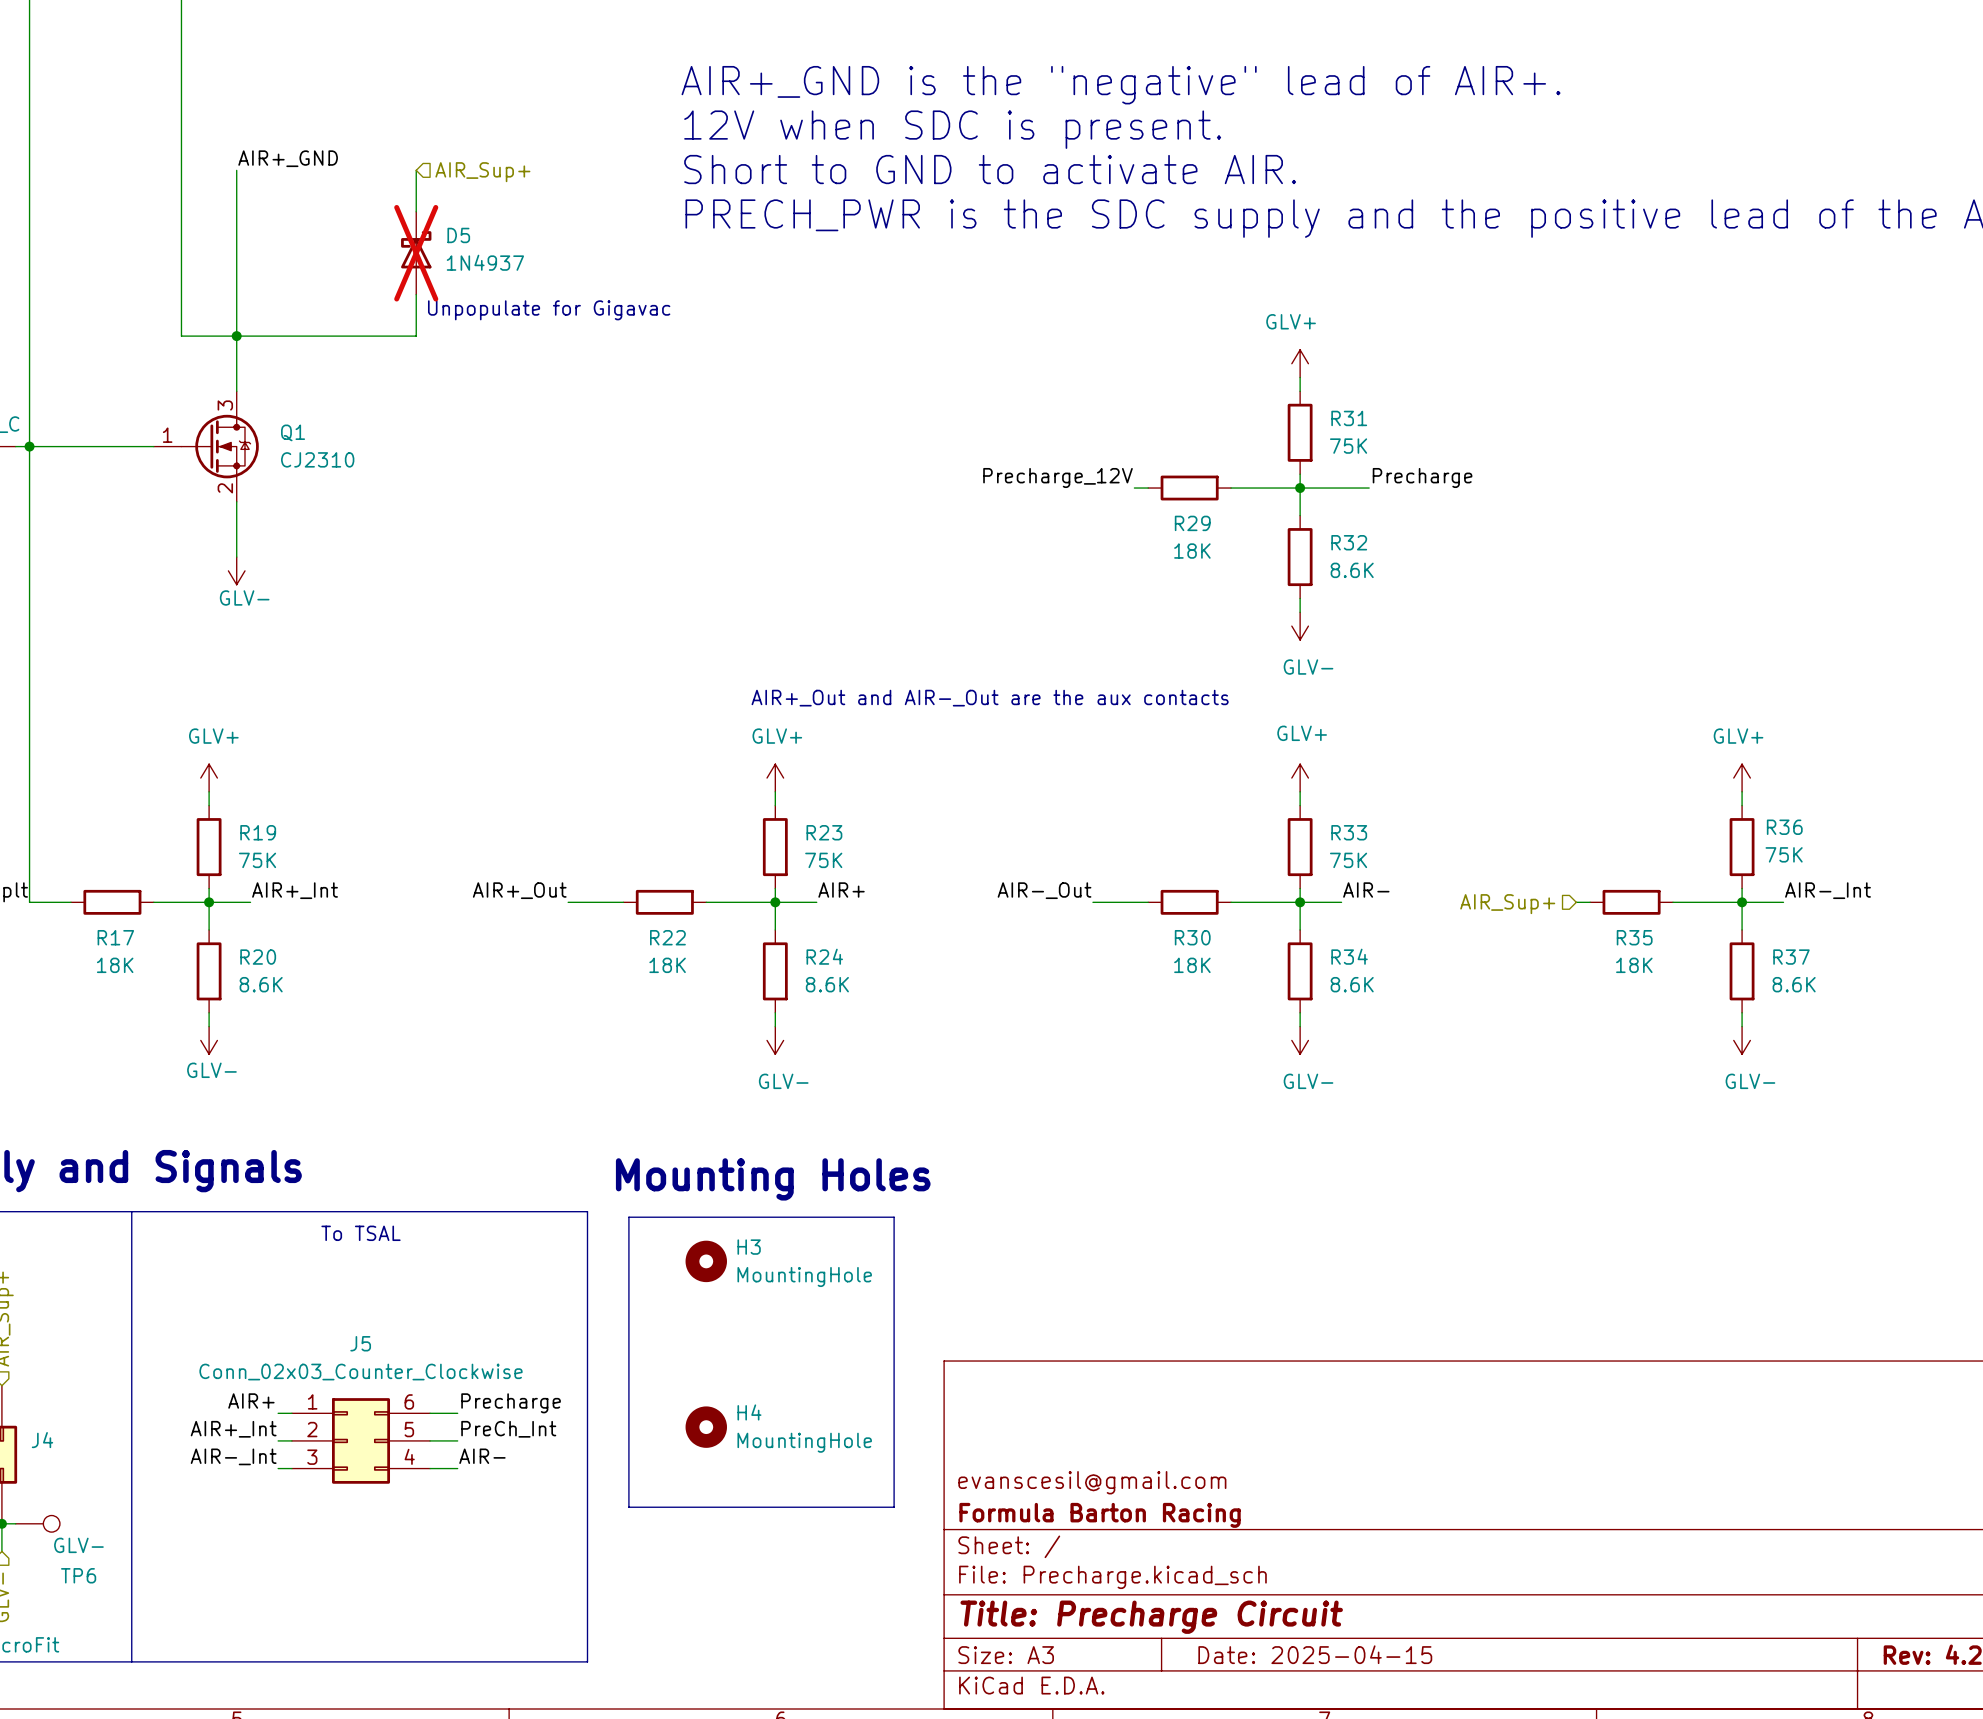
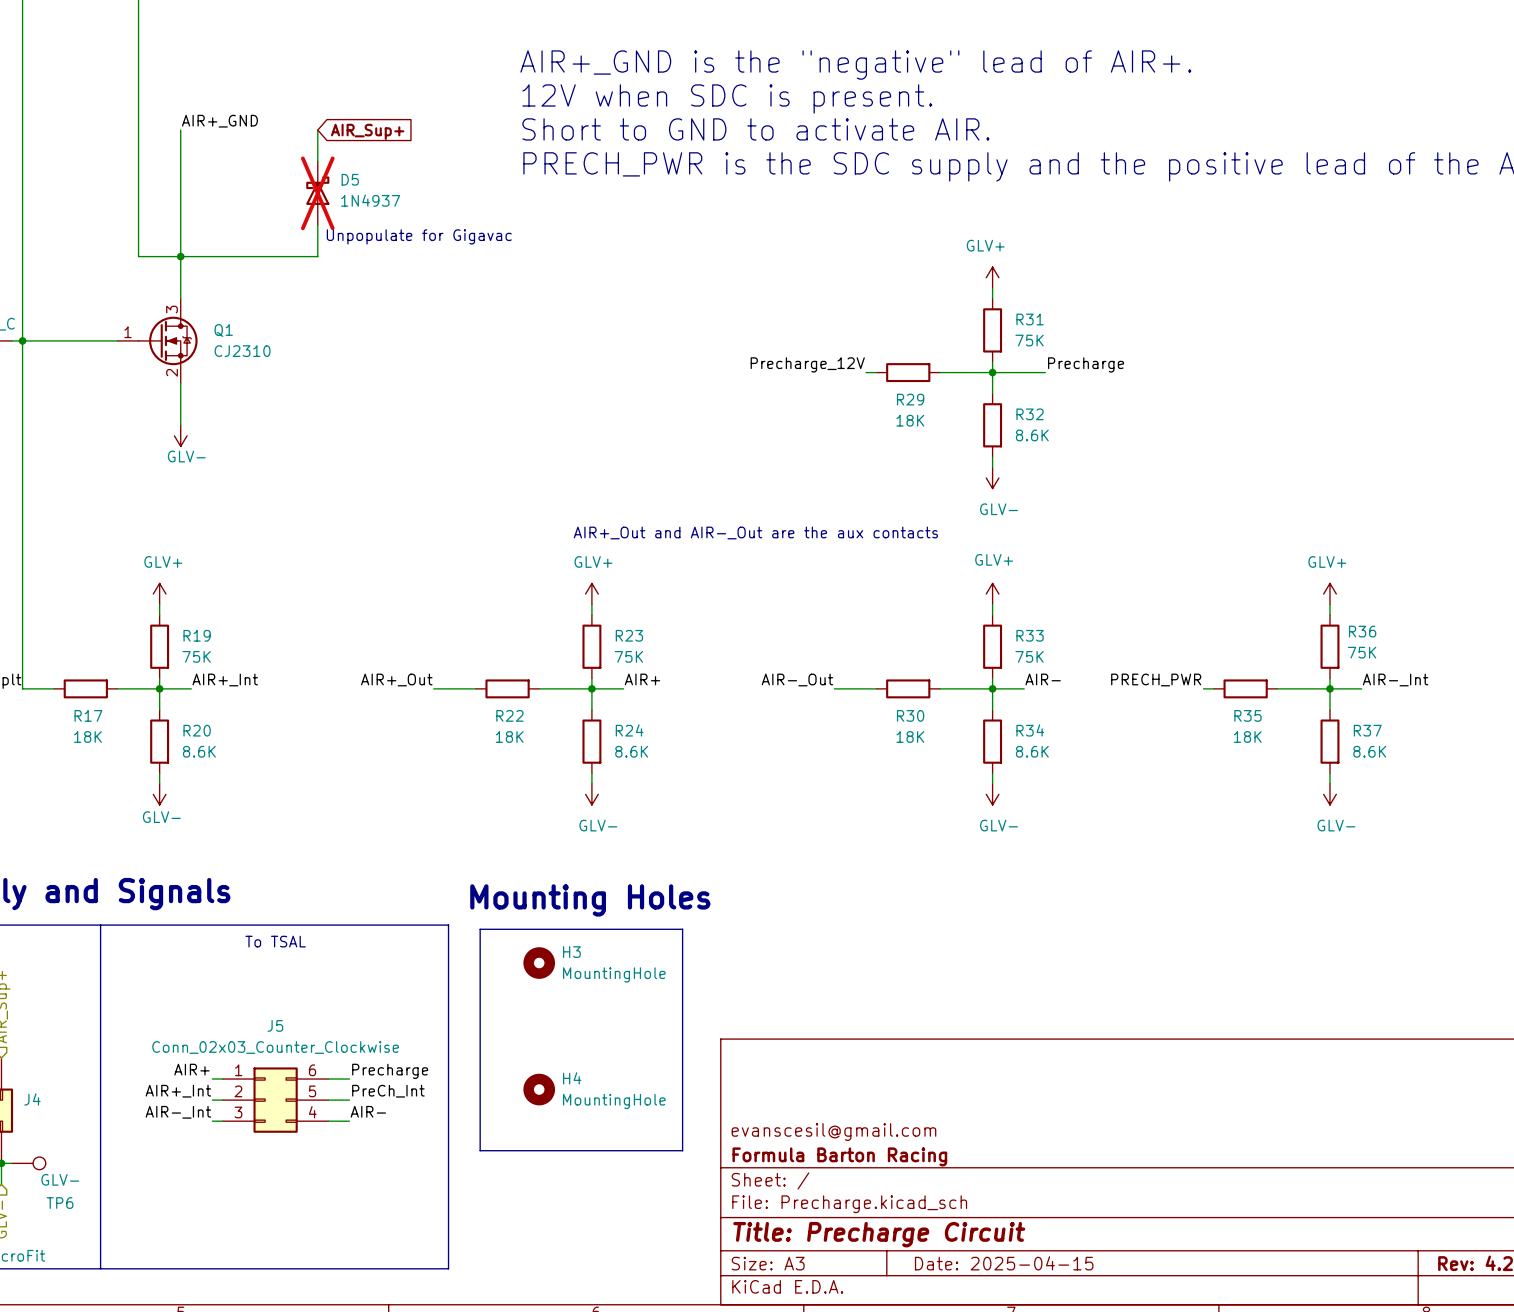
global label: none -> AIR_Sup+ (367, 131)
hierarchical label: AIR_Sup+ (482, 172) -> none
label: none -> PRECH_PWR (1156, 679)
hierarchical label: AIR_Sup+ (1507, 904) -> none

